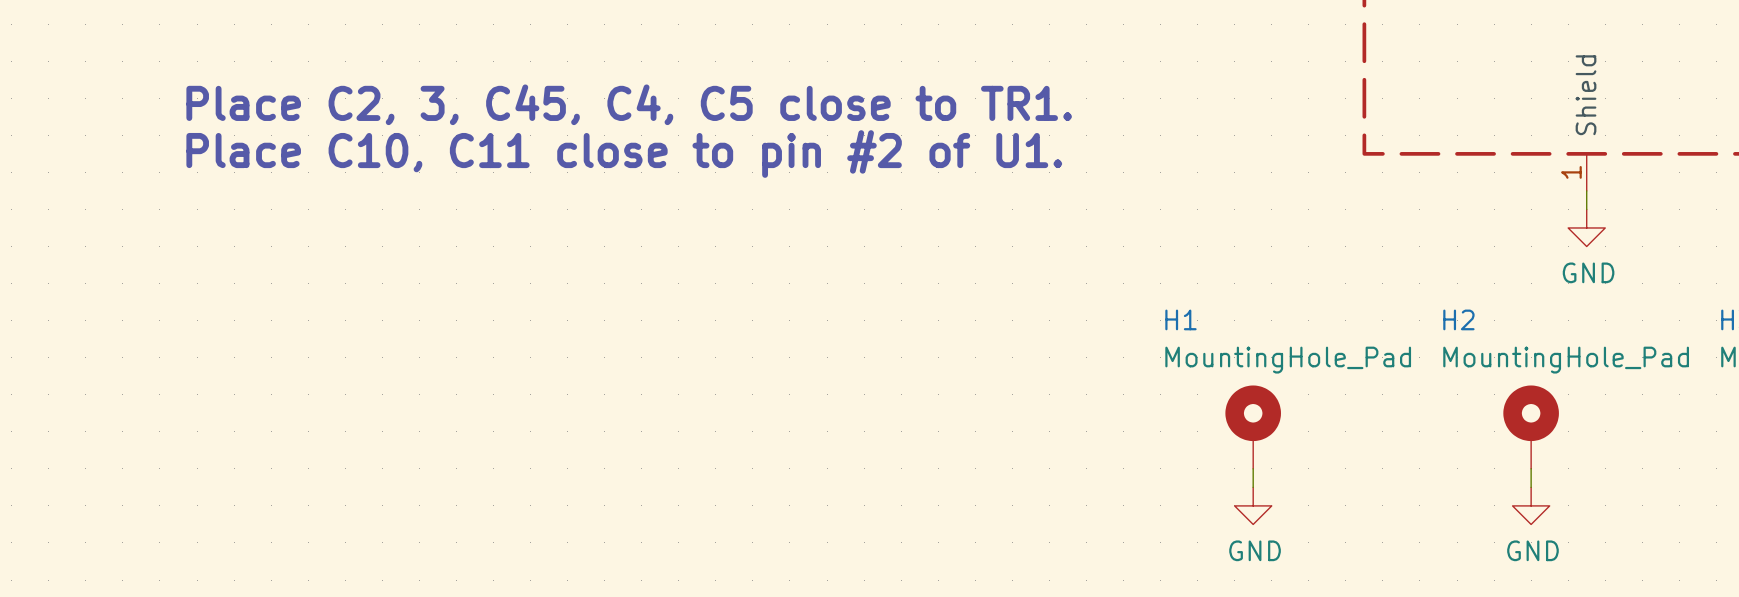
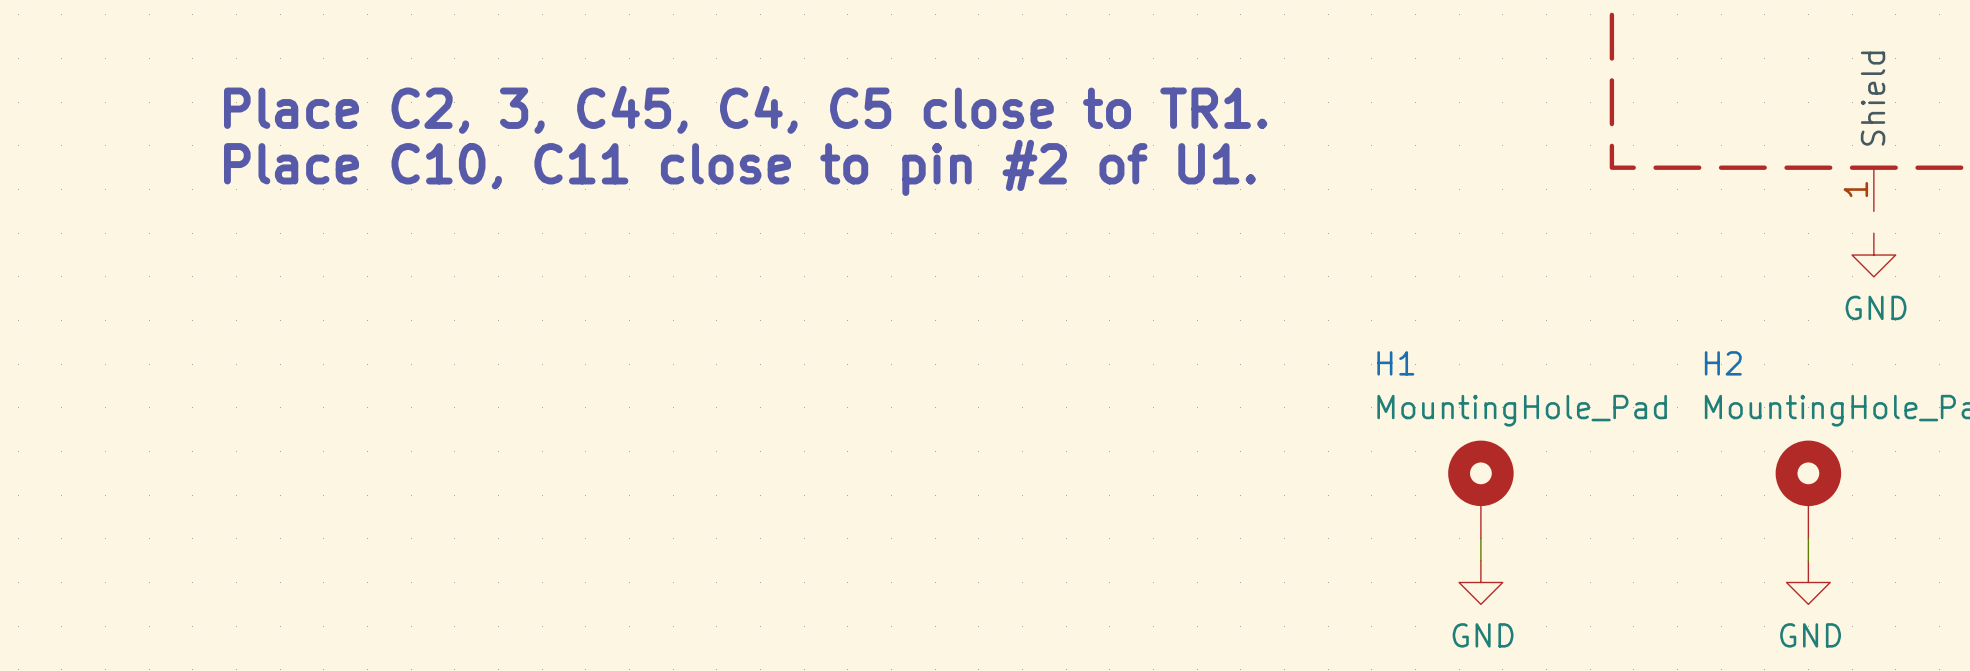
wire: (1586, 190) (1586, 209) -> none

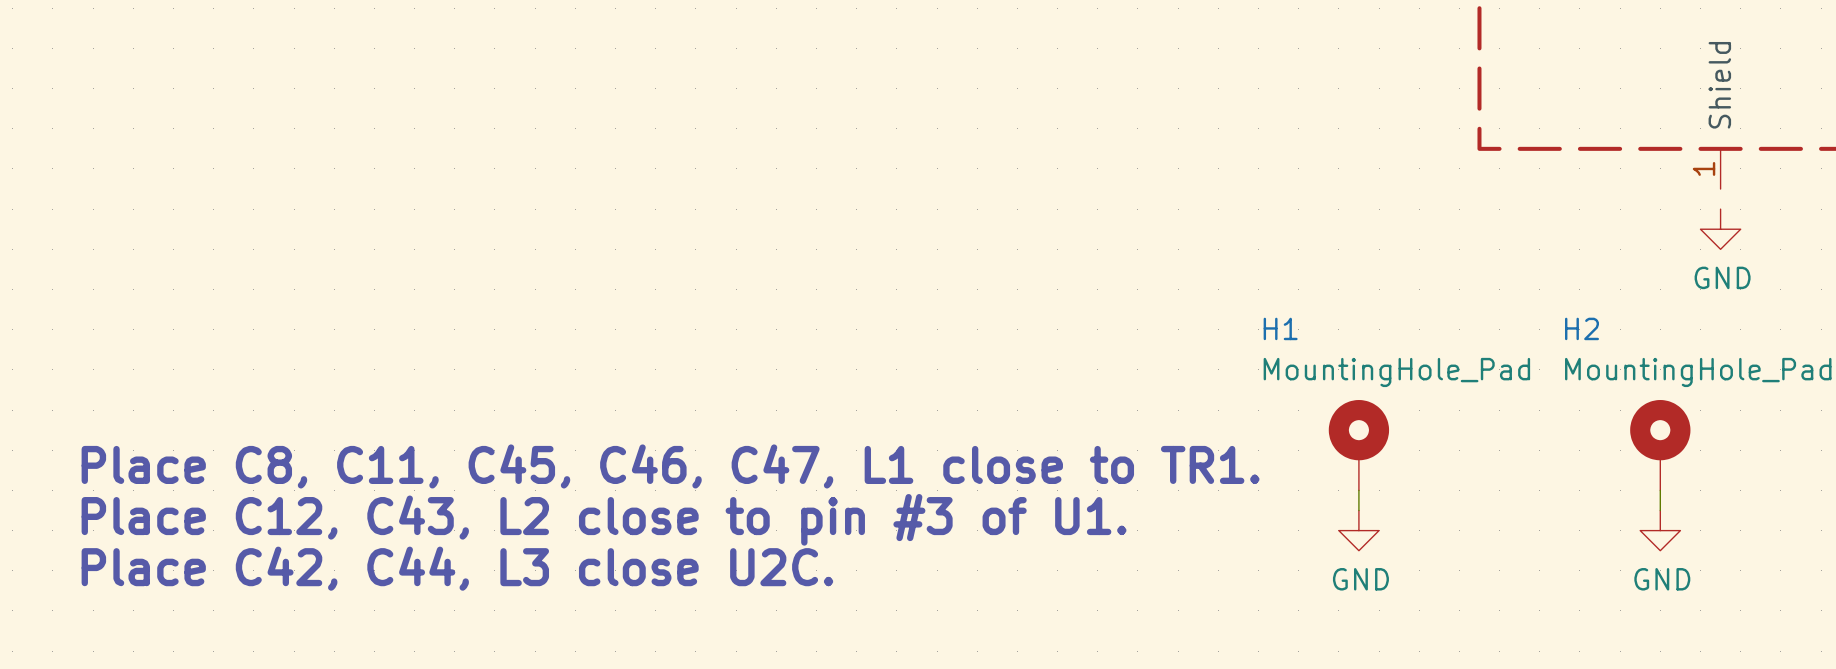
text: Place C2, 3, C45, C4, C5 close to TR1. (745, 109) -> none
text: Place C10, C11 close to pin #2 of U1. (739, 167) -> none
text: none -> Place C8, C11, C45, C46, C47, L1 close to TR1. (670, 466)
text: none -> Place C12, C43, L2 close to pin #3 of U1. (604, 519)
text: none -> Place C42, C44, L3 close U2C. (457, 568)

